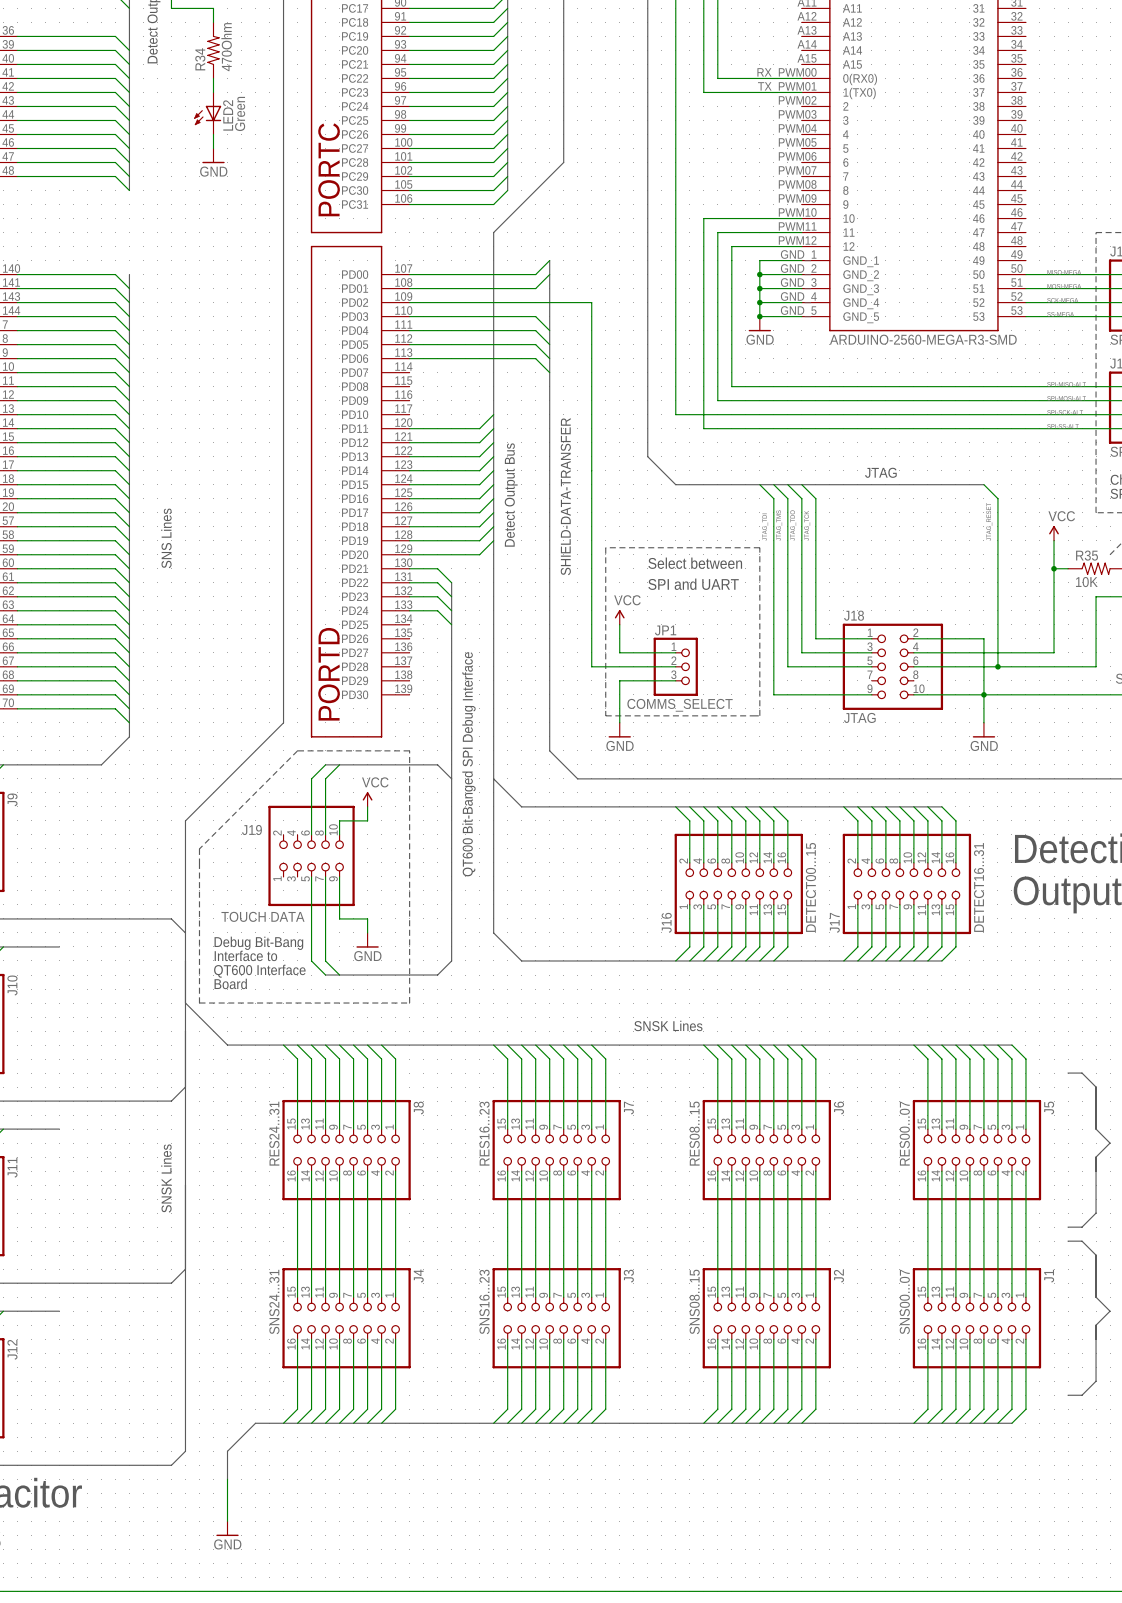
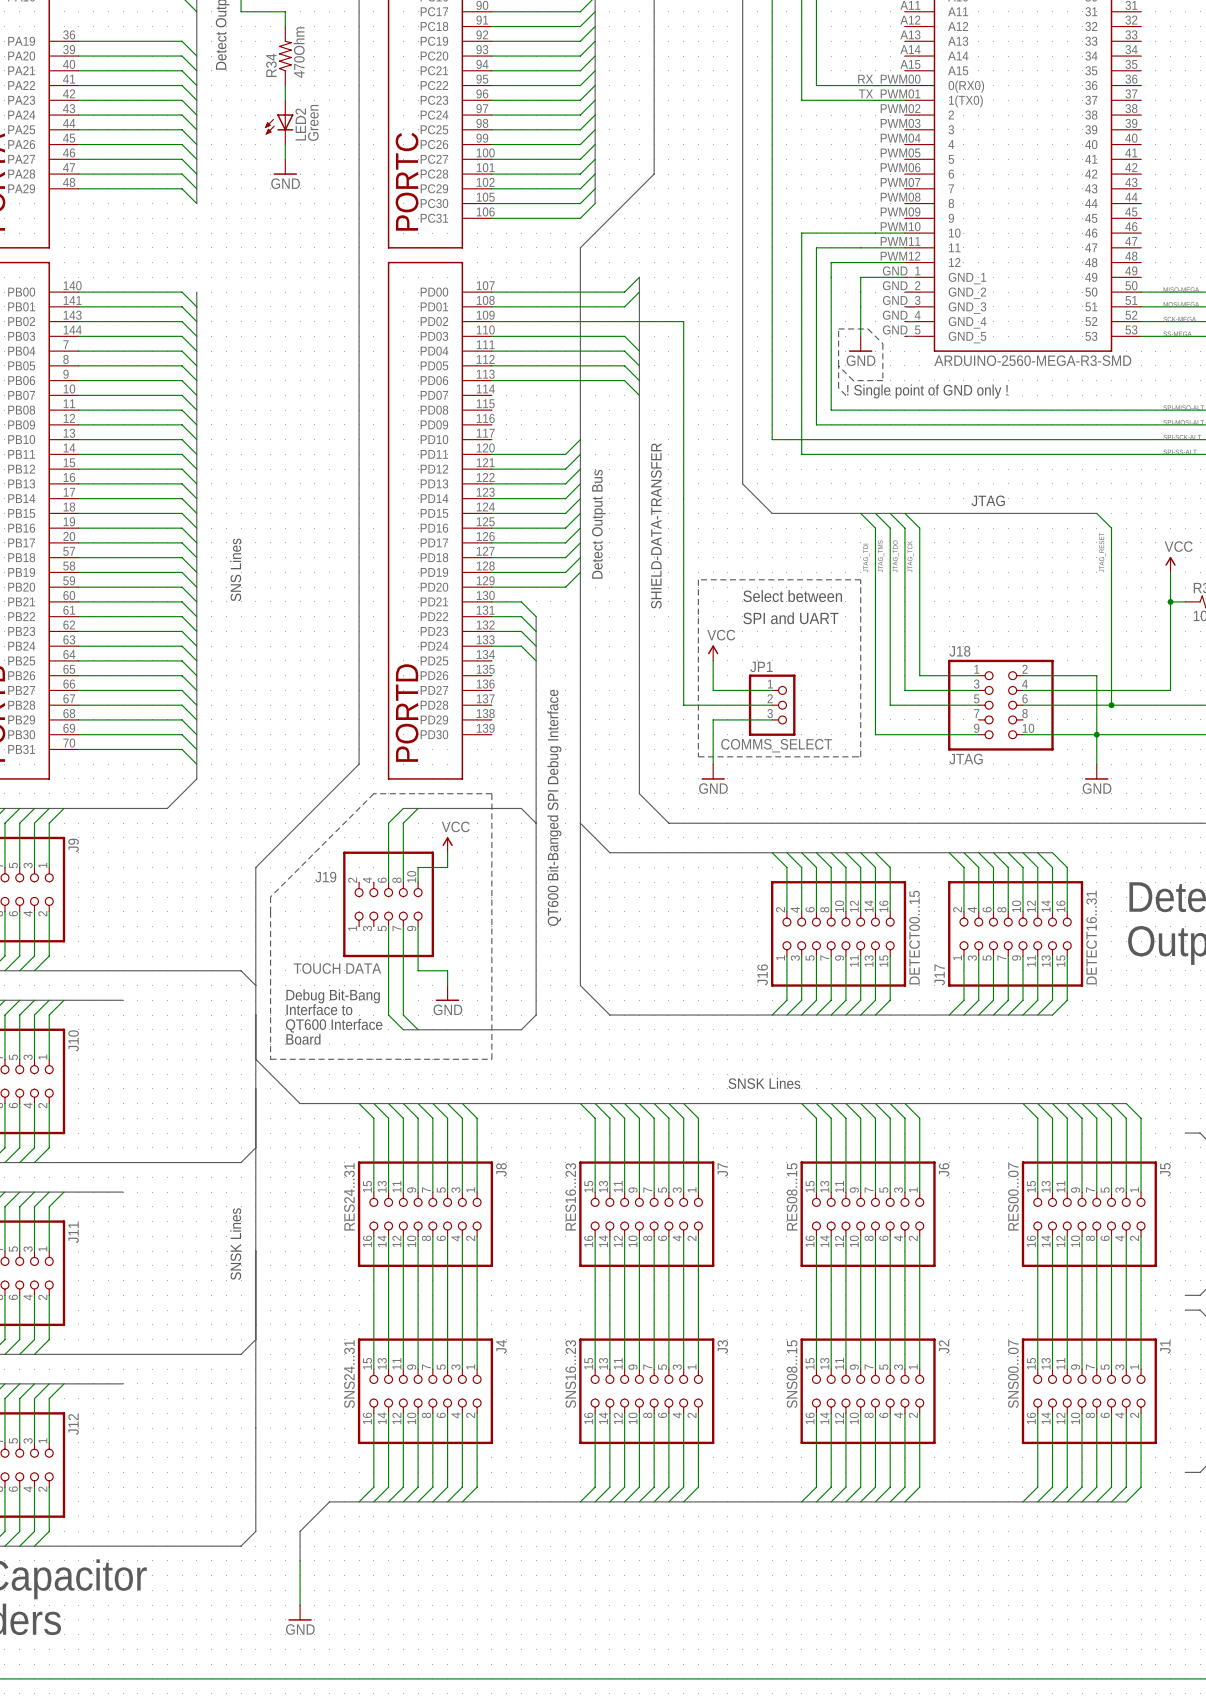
wire: (759, 274) (801, 274) -> none
junction: (759, 274) -> none
wire: (759, 288) (801, 288) -> none
junction: (759, 288) -> none
wire: (759, 302) (801, 302) -> none
junction: (759, 302) -> none
wire: (759, 316) (801, 316) -> none
junction: (759, 316) -> none
line: none -> (838, 365) (853, 380) (882, 380) (882, 343) (868, 328) (838, 328) (838, 387) (845, 395)
text: none -> ! Single point of GND only ! (927, 391)

